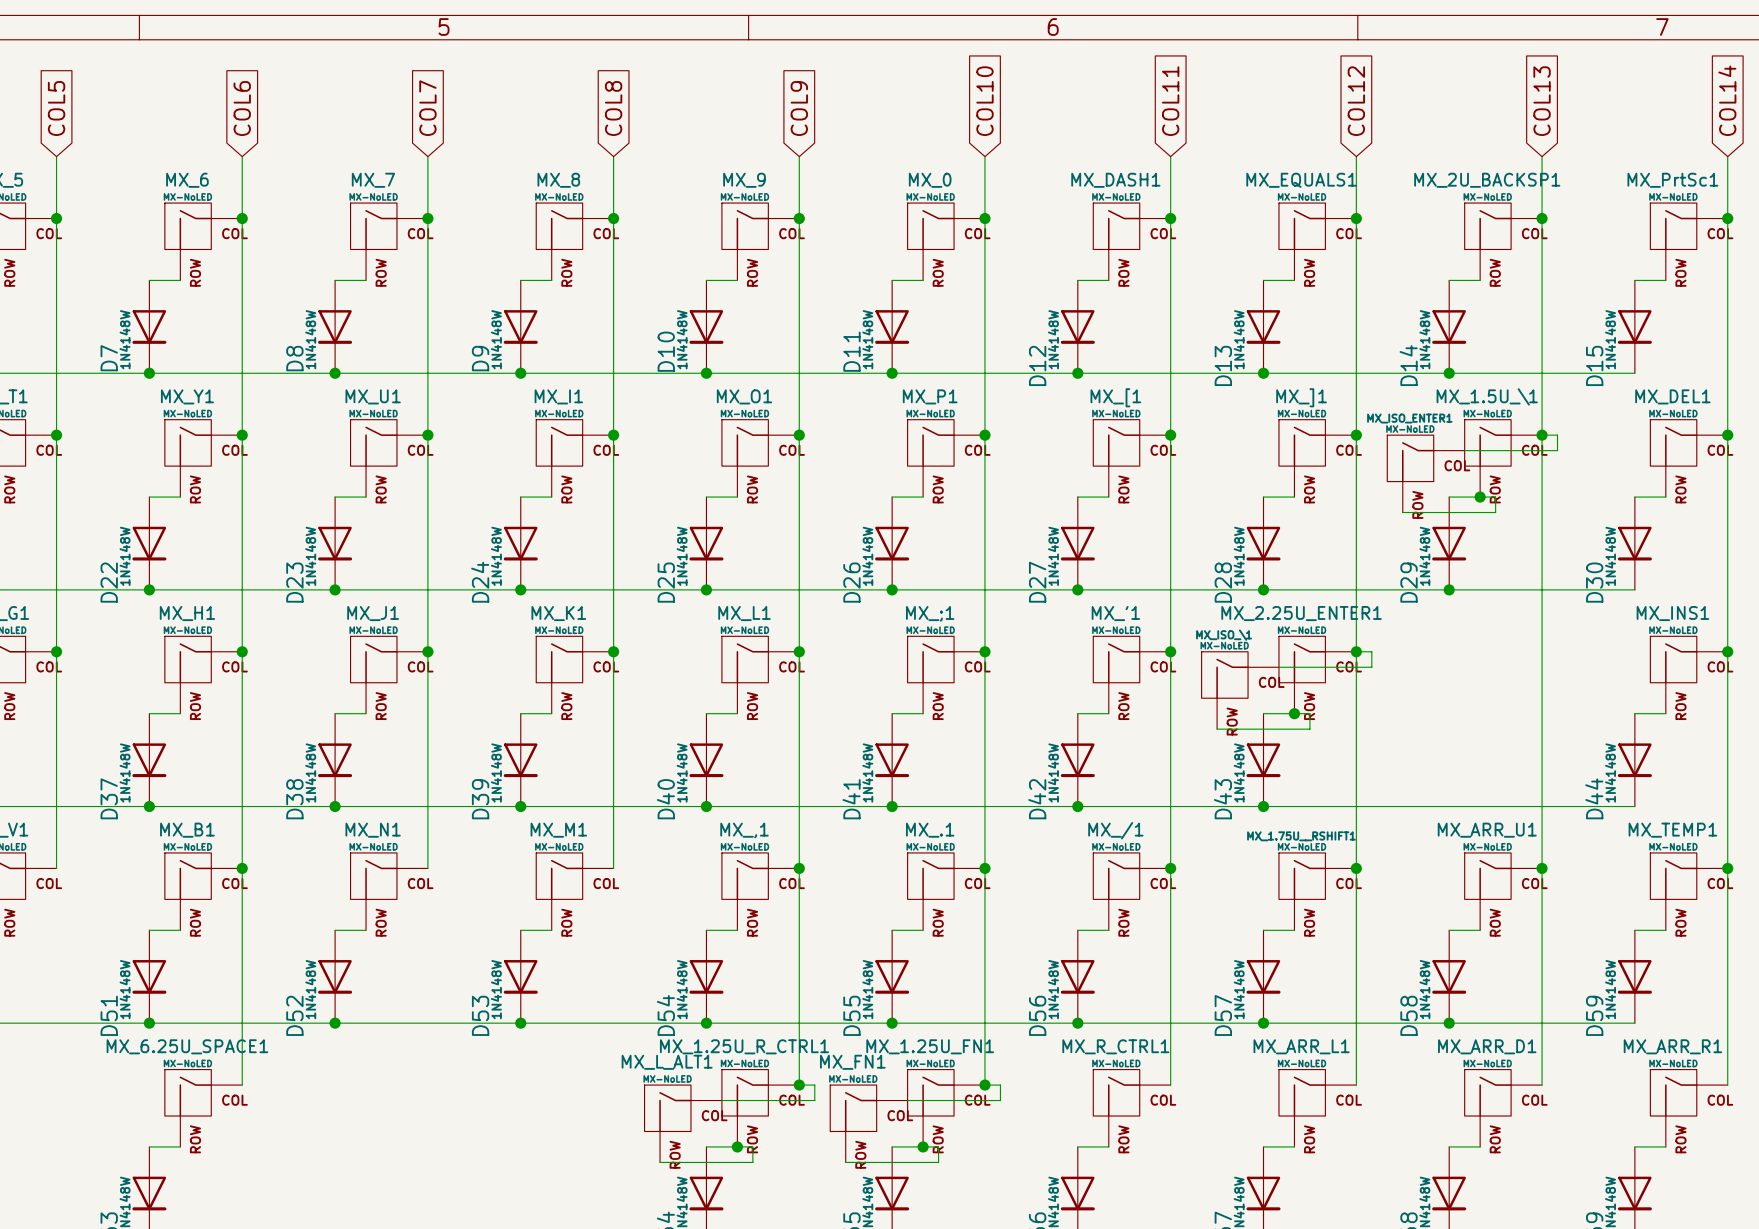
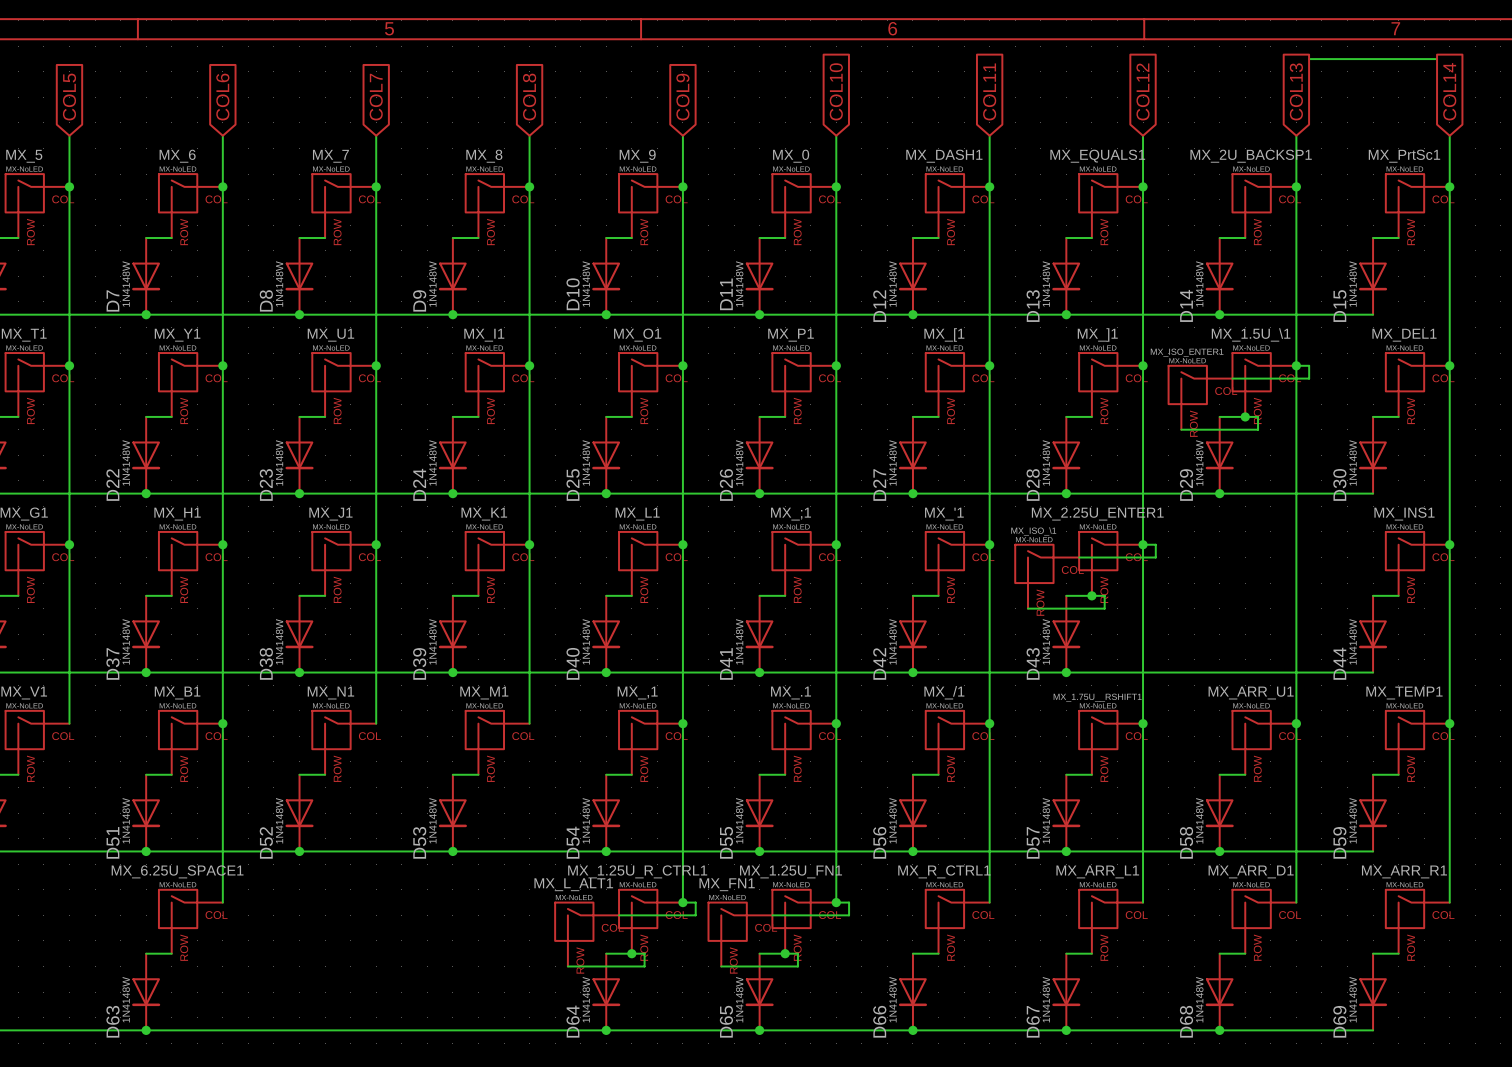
wire: none -> (1309, 59) (1436, 59)

